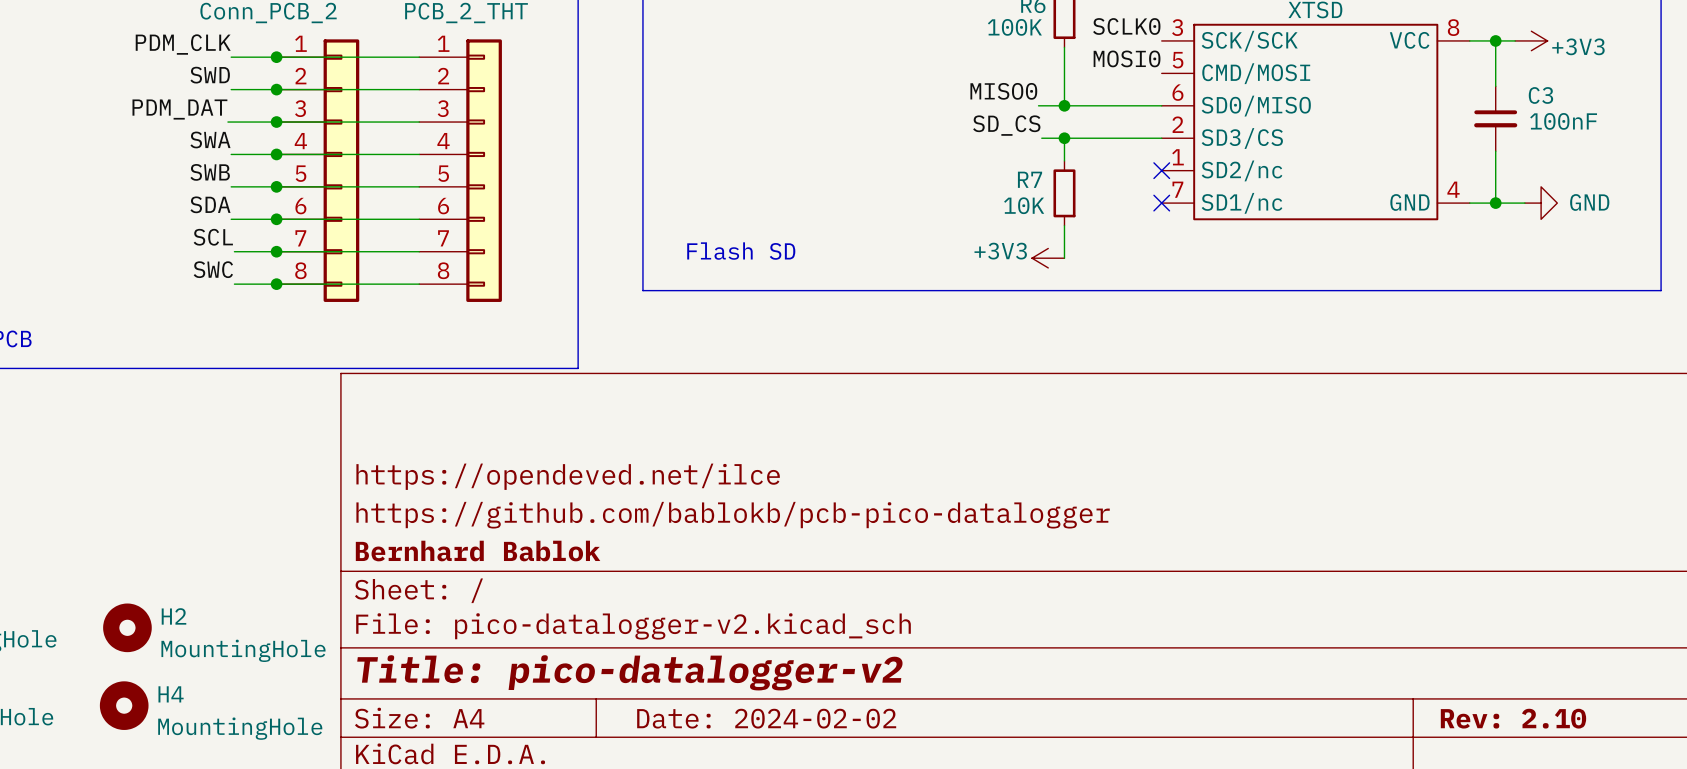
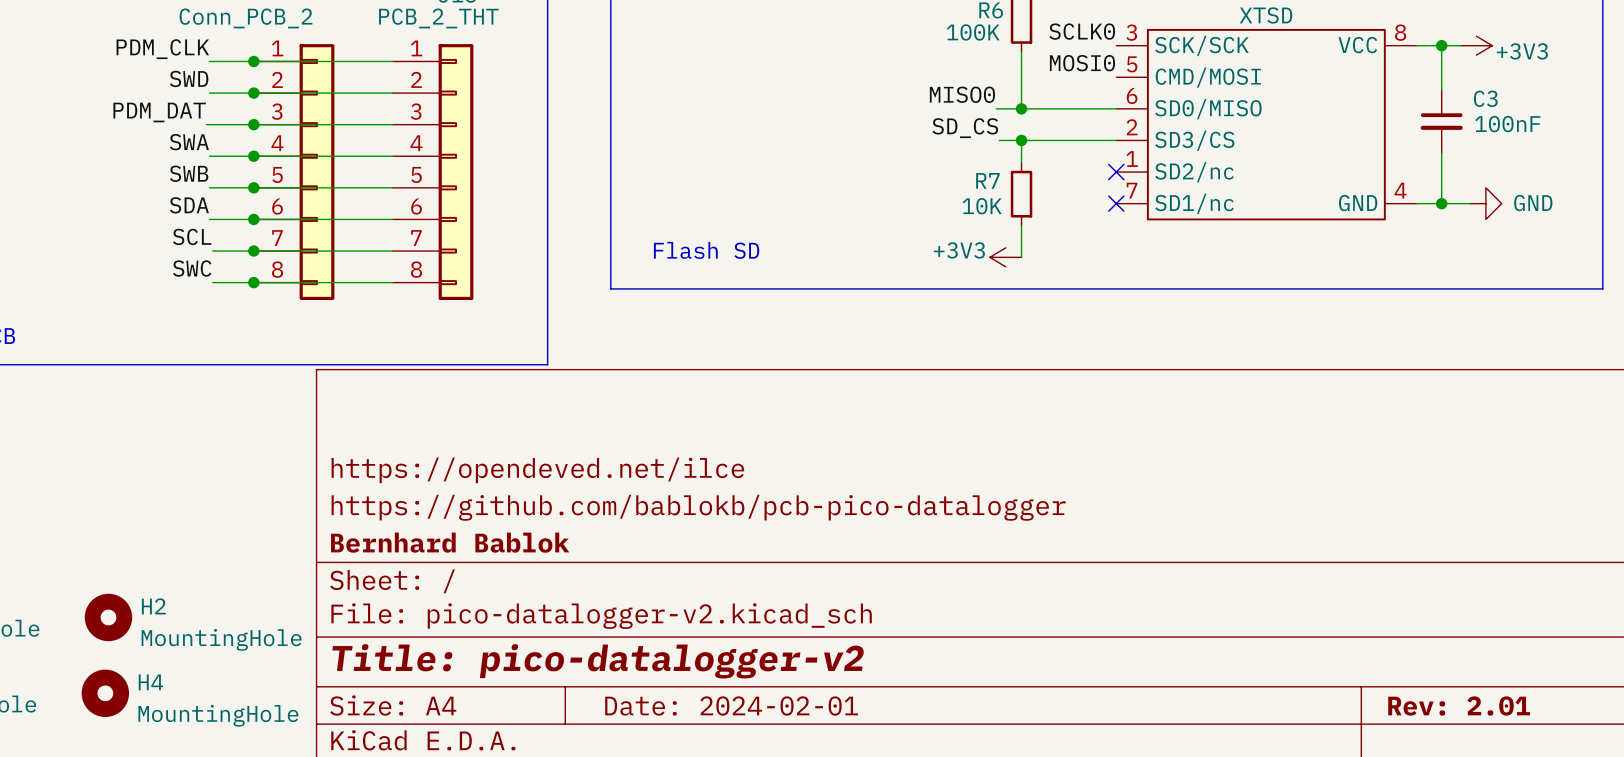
title block: Date: 2024-02-02 (766, 718) -> Date: 2024-02-01 (731, 706)
title block: Rev: 2.10 (1513, 718) -> Rev: 2.01 (1459, 706)

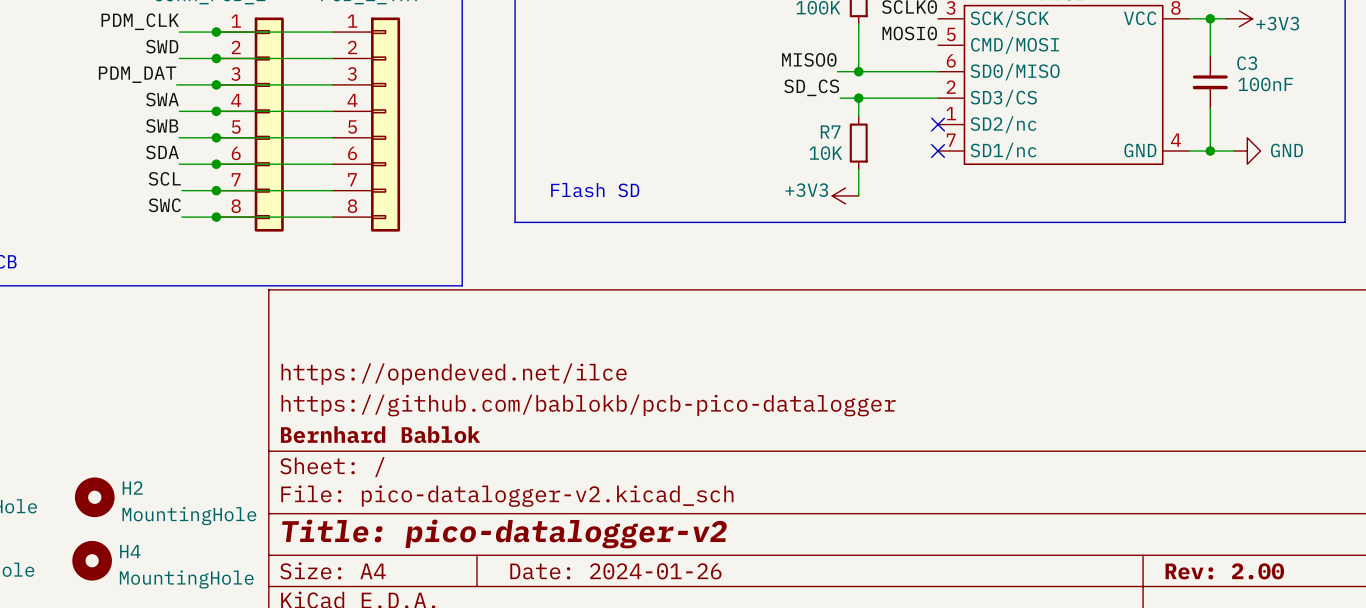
title block: Date: 2024-02-01 (731, 706) -> Date: 2024-01-26 (615, 571)
title block: Rev: 2.01 (1459, 706) -> Rev: 2.00 (1224, 571)

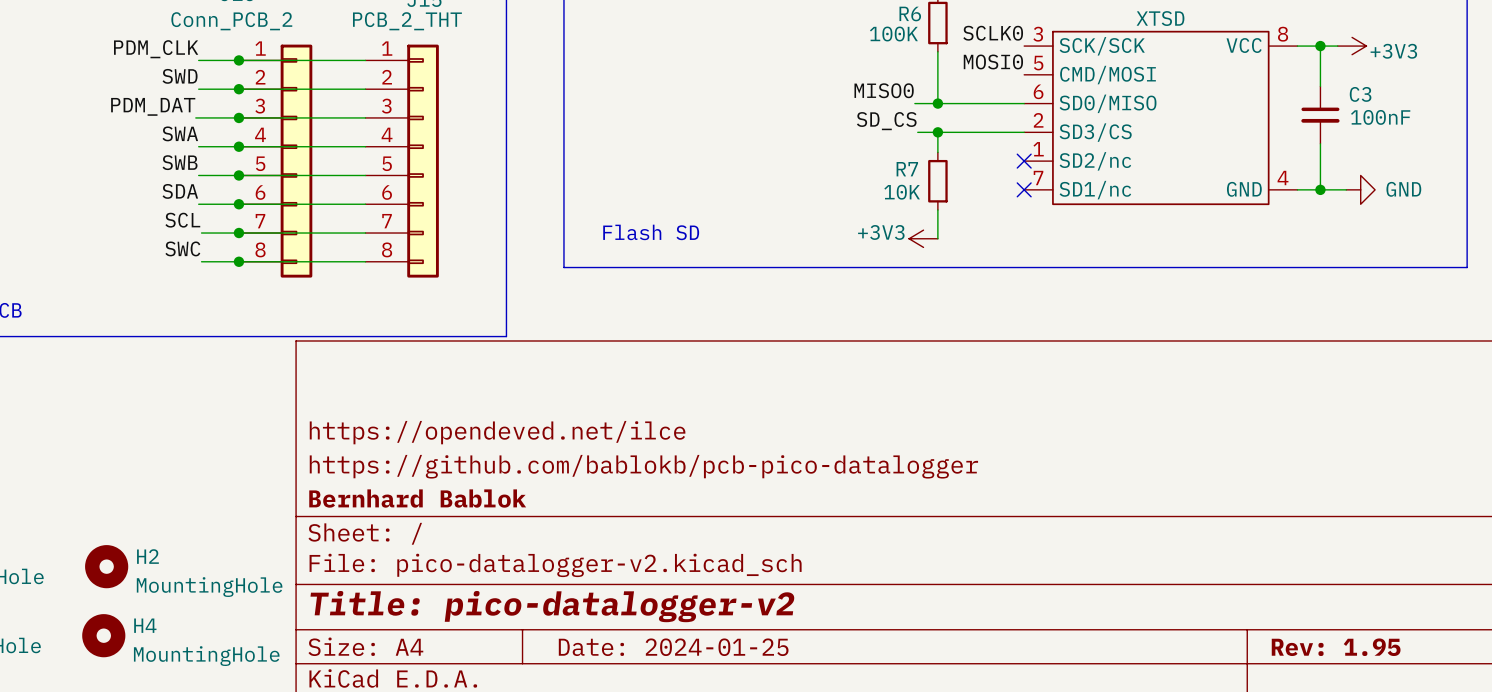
title block: Date: 2024-01-26 (615, 571) -> Date: 2024-01-25 (673, 647)
title block: Rev: 2.00 (1224, 571) -> Rev: 1.95 (1336, 647)

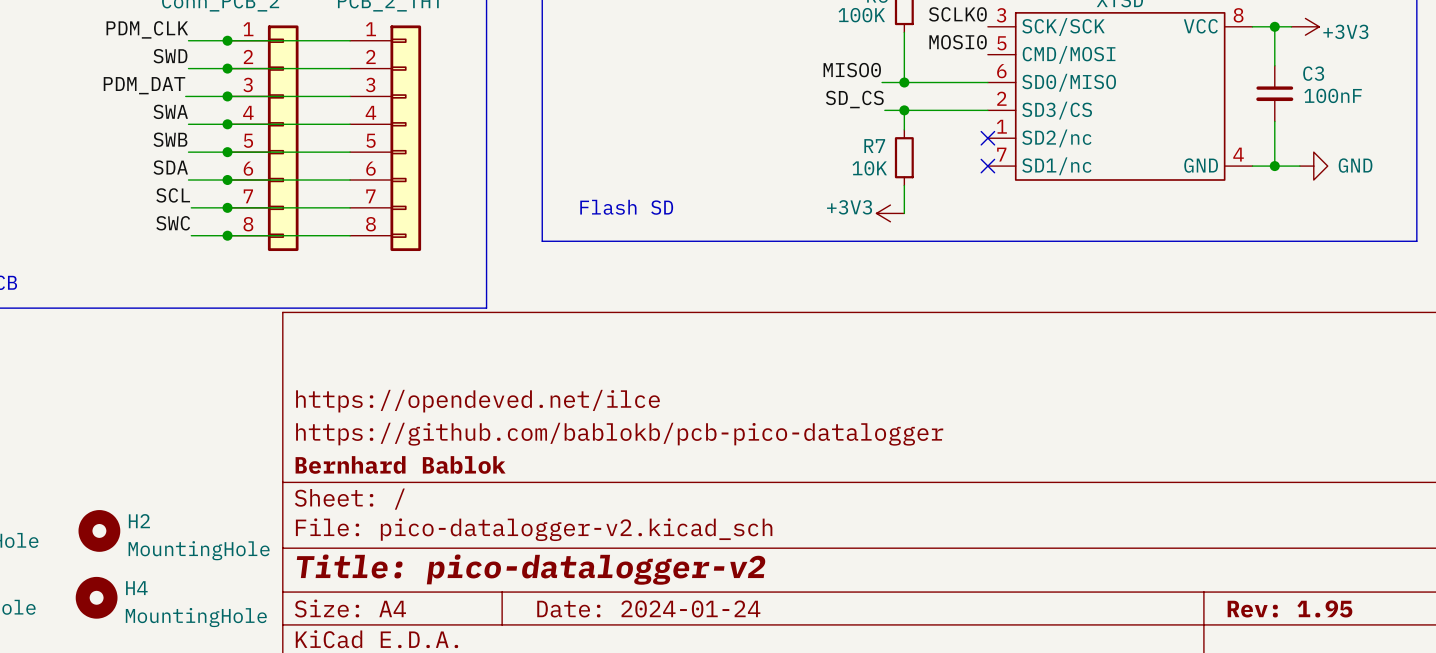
title block: Date: 2024-01-25 (673, 647) -> Date: 2024-01-24 (648, 608)

